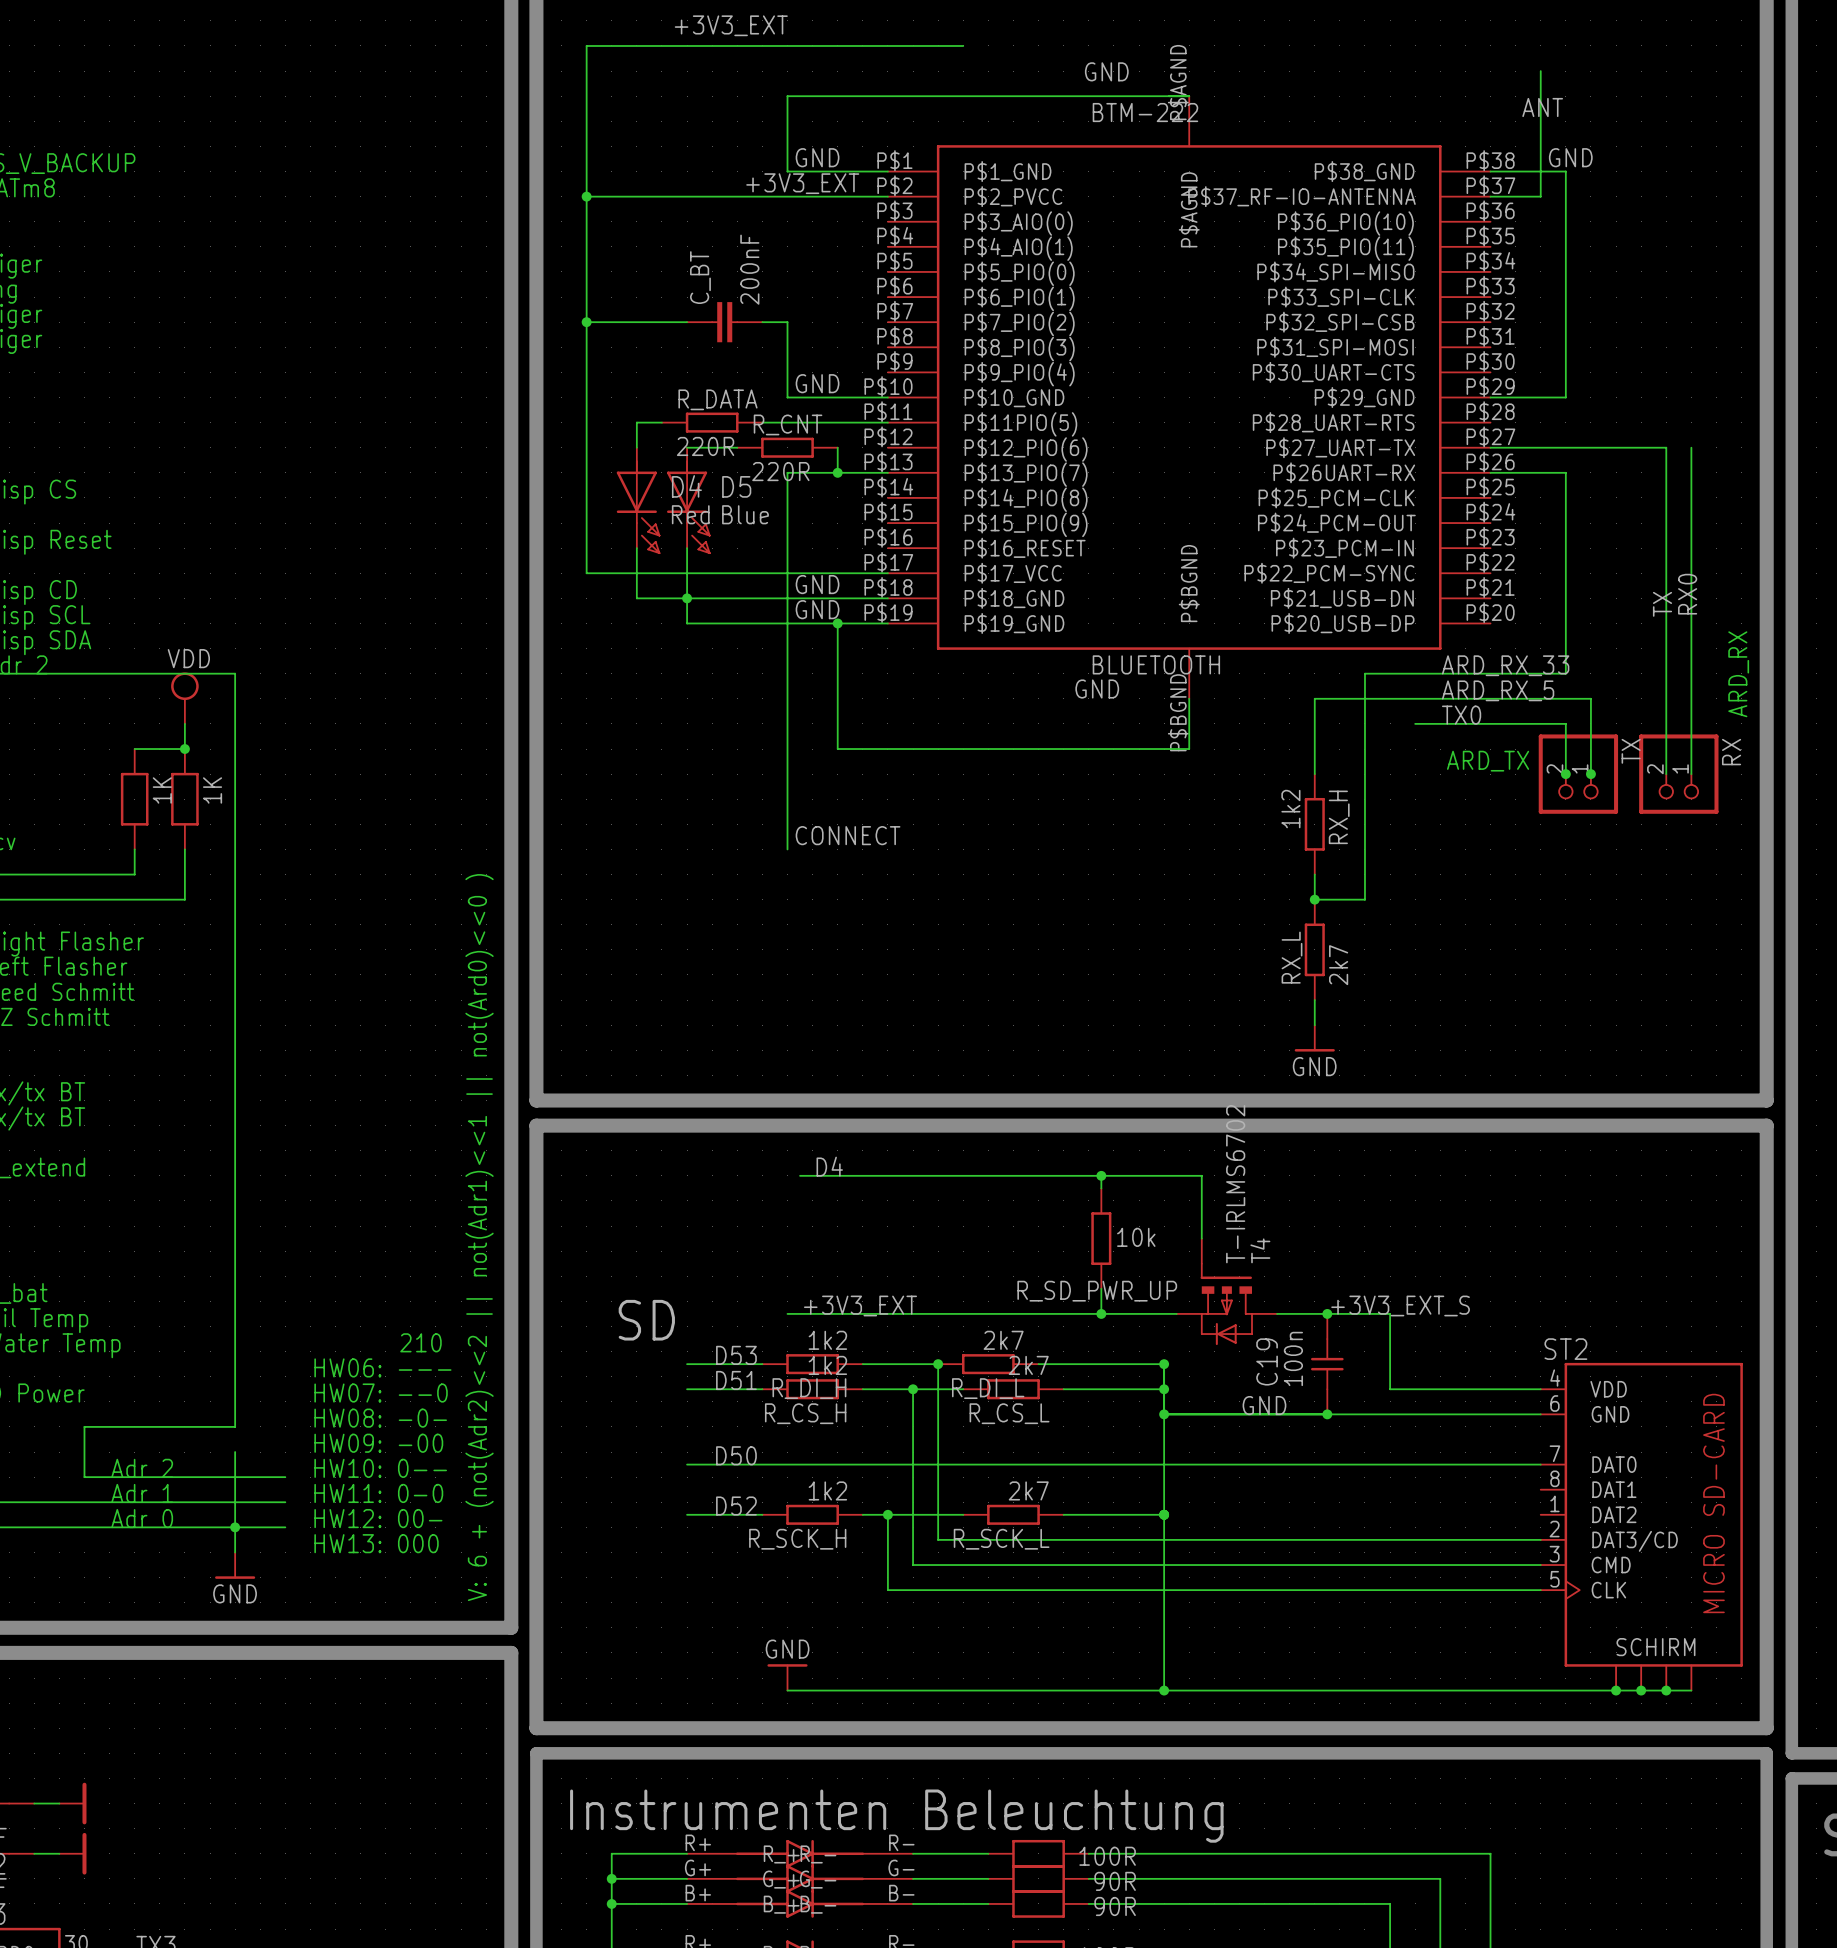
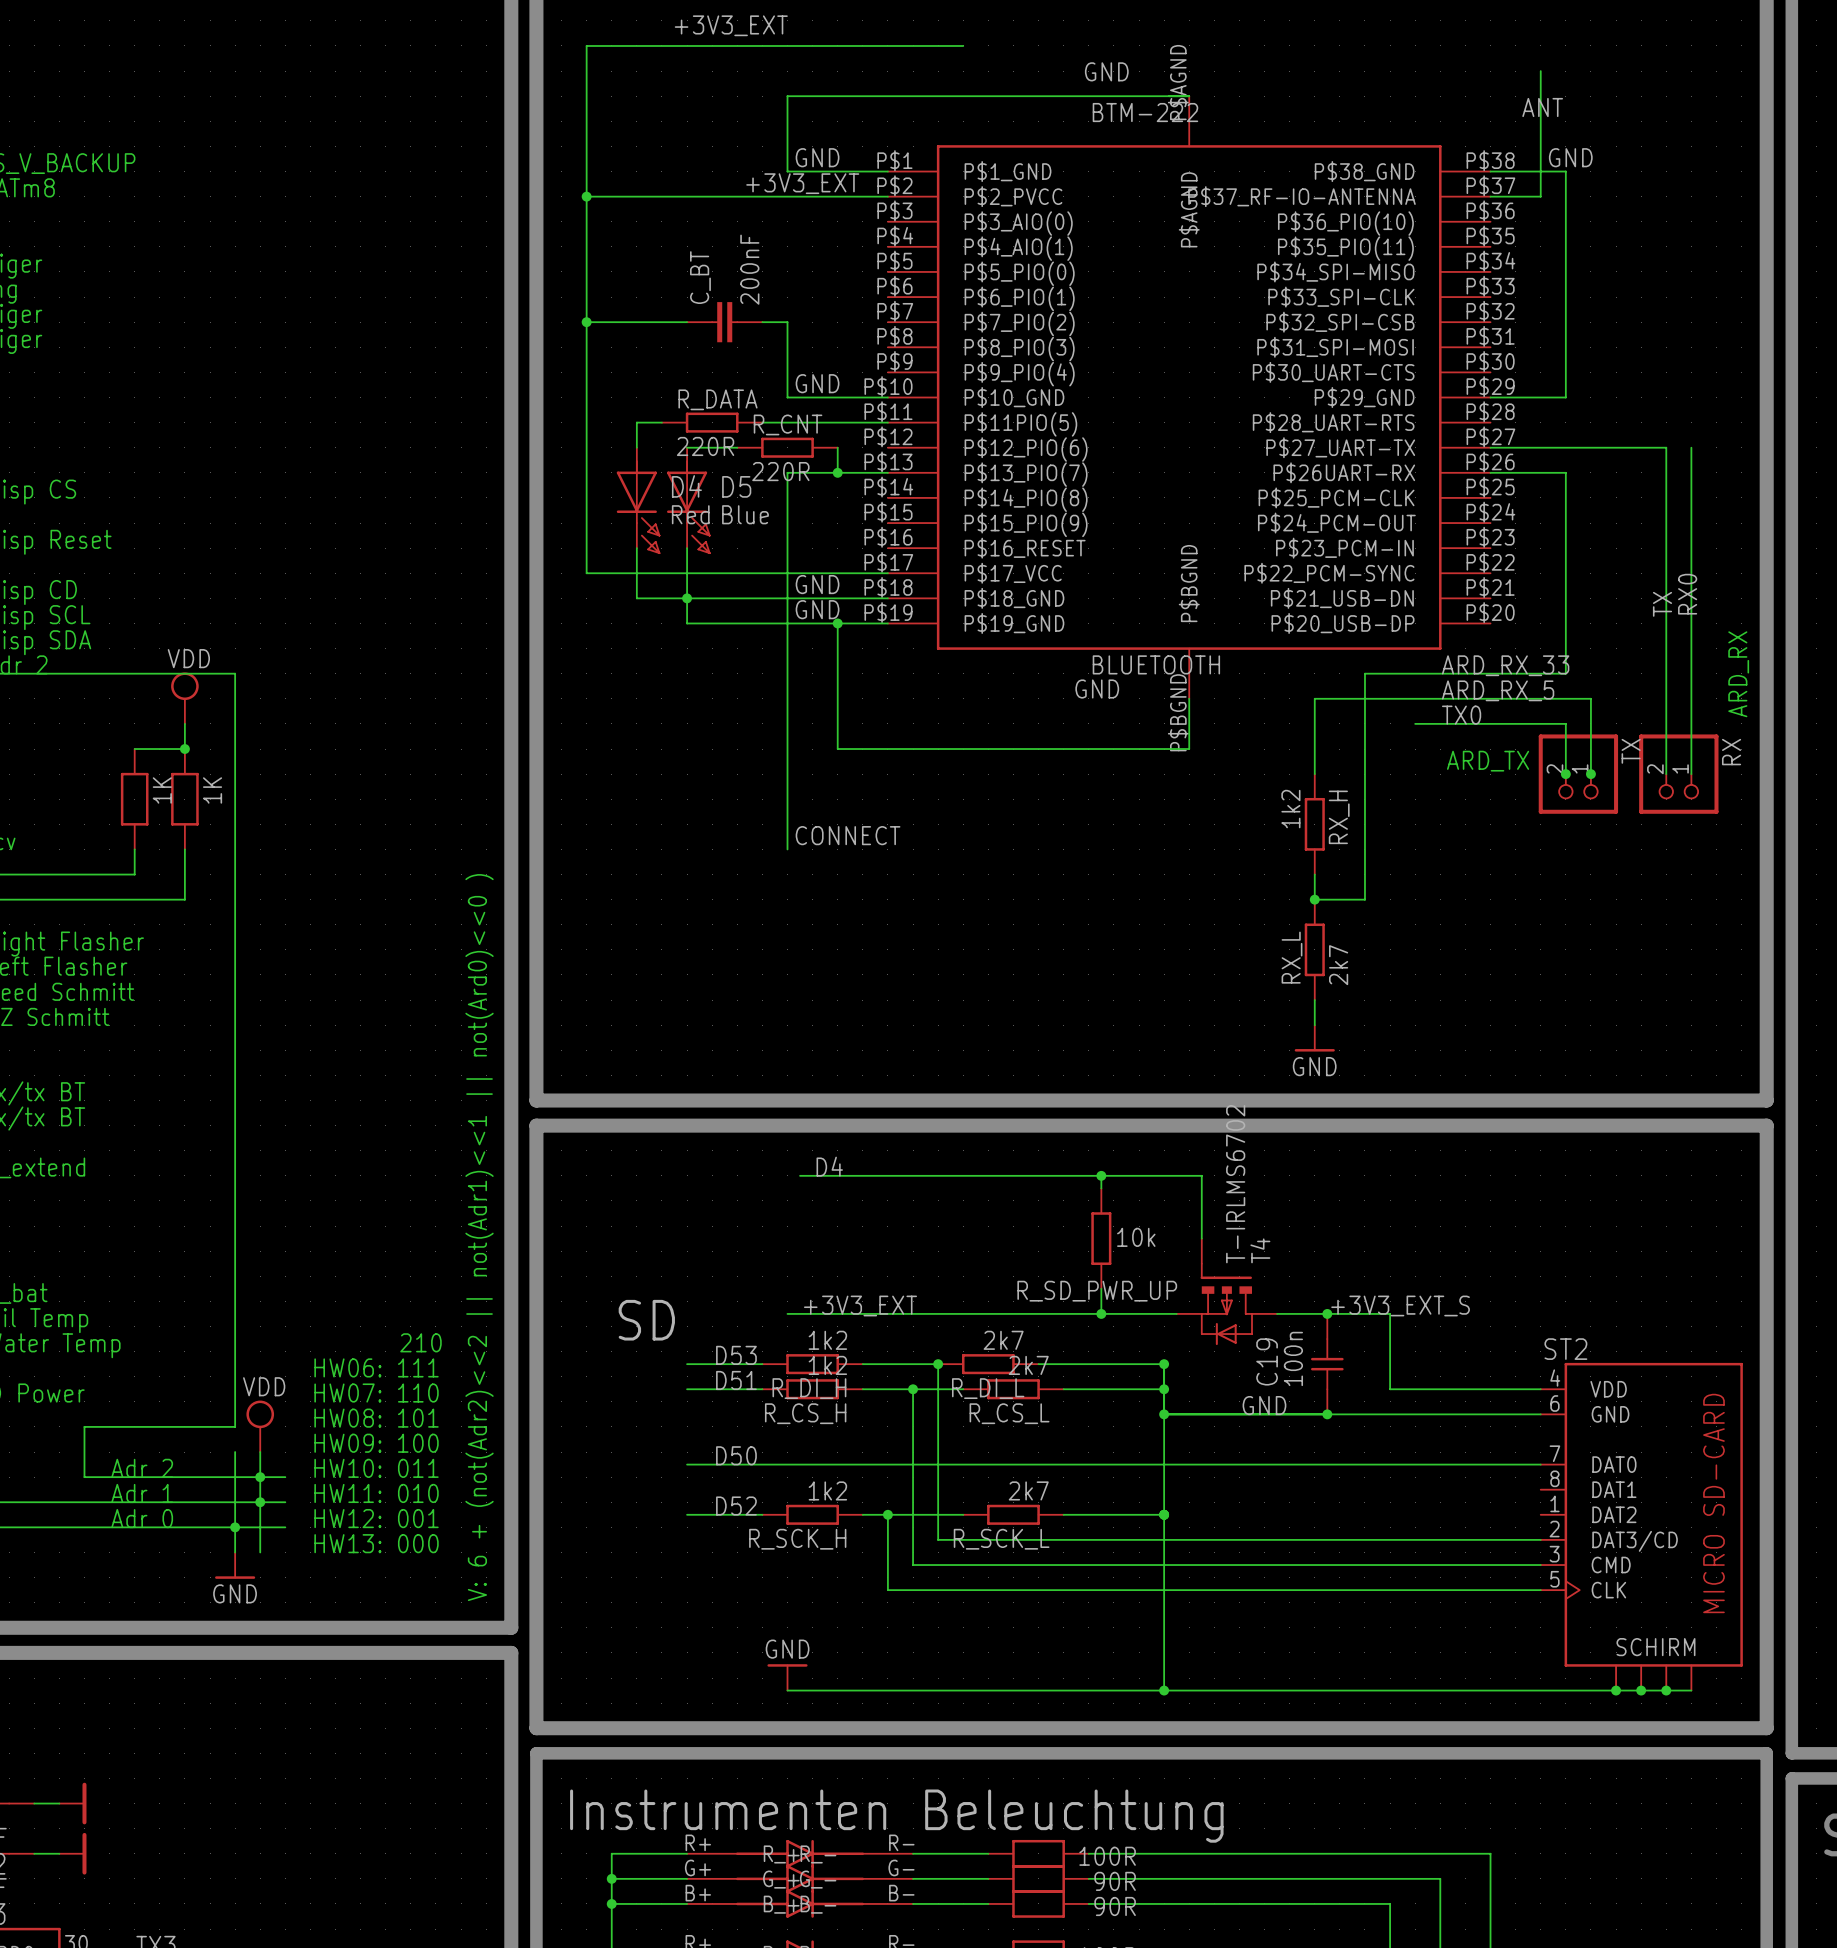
text: HW06: --- (382, 1367) -> HW06: 111 (376, 1367)
text: HW07: --0 (381, 1393) -> HW07: 110 (376, 1393)
text: HW08: -0- (380, 1418) -> HW08: 101 (376, 1418)
power symbol: none -> VDD (260, 1426)
text: HW09: -00 (378, 1443) -> HW09: 100 (376, 1443)
wire: none -> (260, 1452) (260, 1552)
text: HW10: 0-- (380, 1468) -> HW10: 011 (376, 1468)
junction: none -> (260, 1477)
text: HW11: 0-0 (378, 1493) -> HW11: 010 (376, 1493)
junction: none -> (260, 1502)
text: HW12: 00- (378, 1518) -> HW12: 001 (376, 1518)

